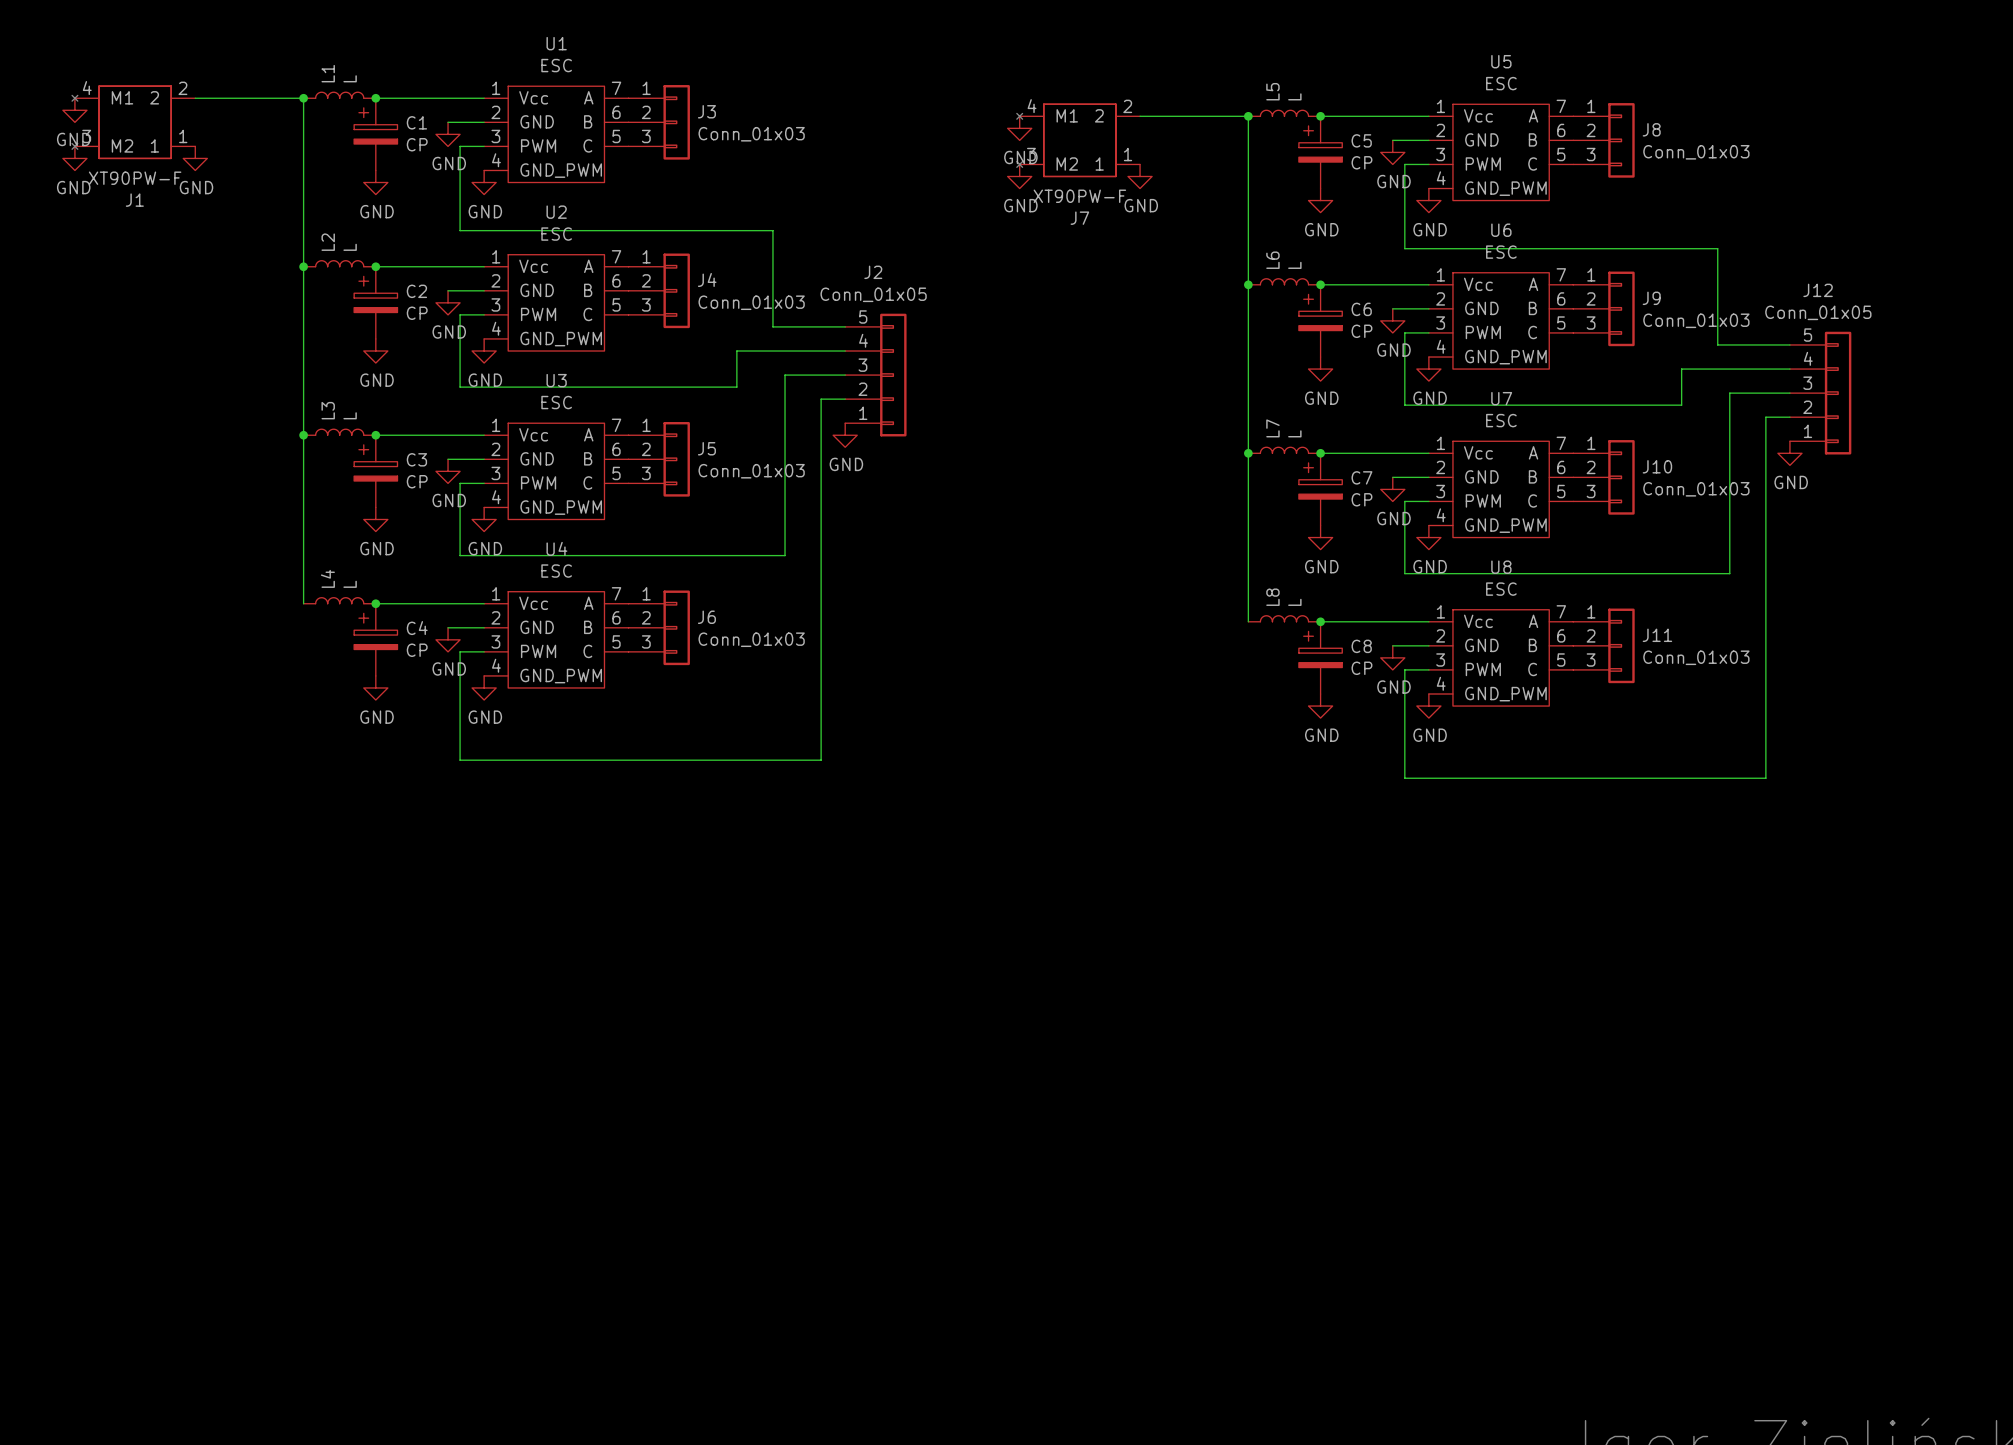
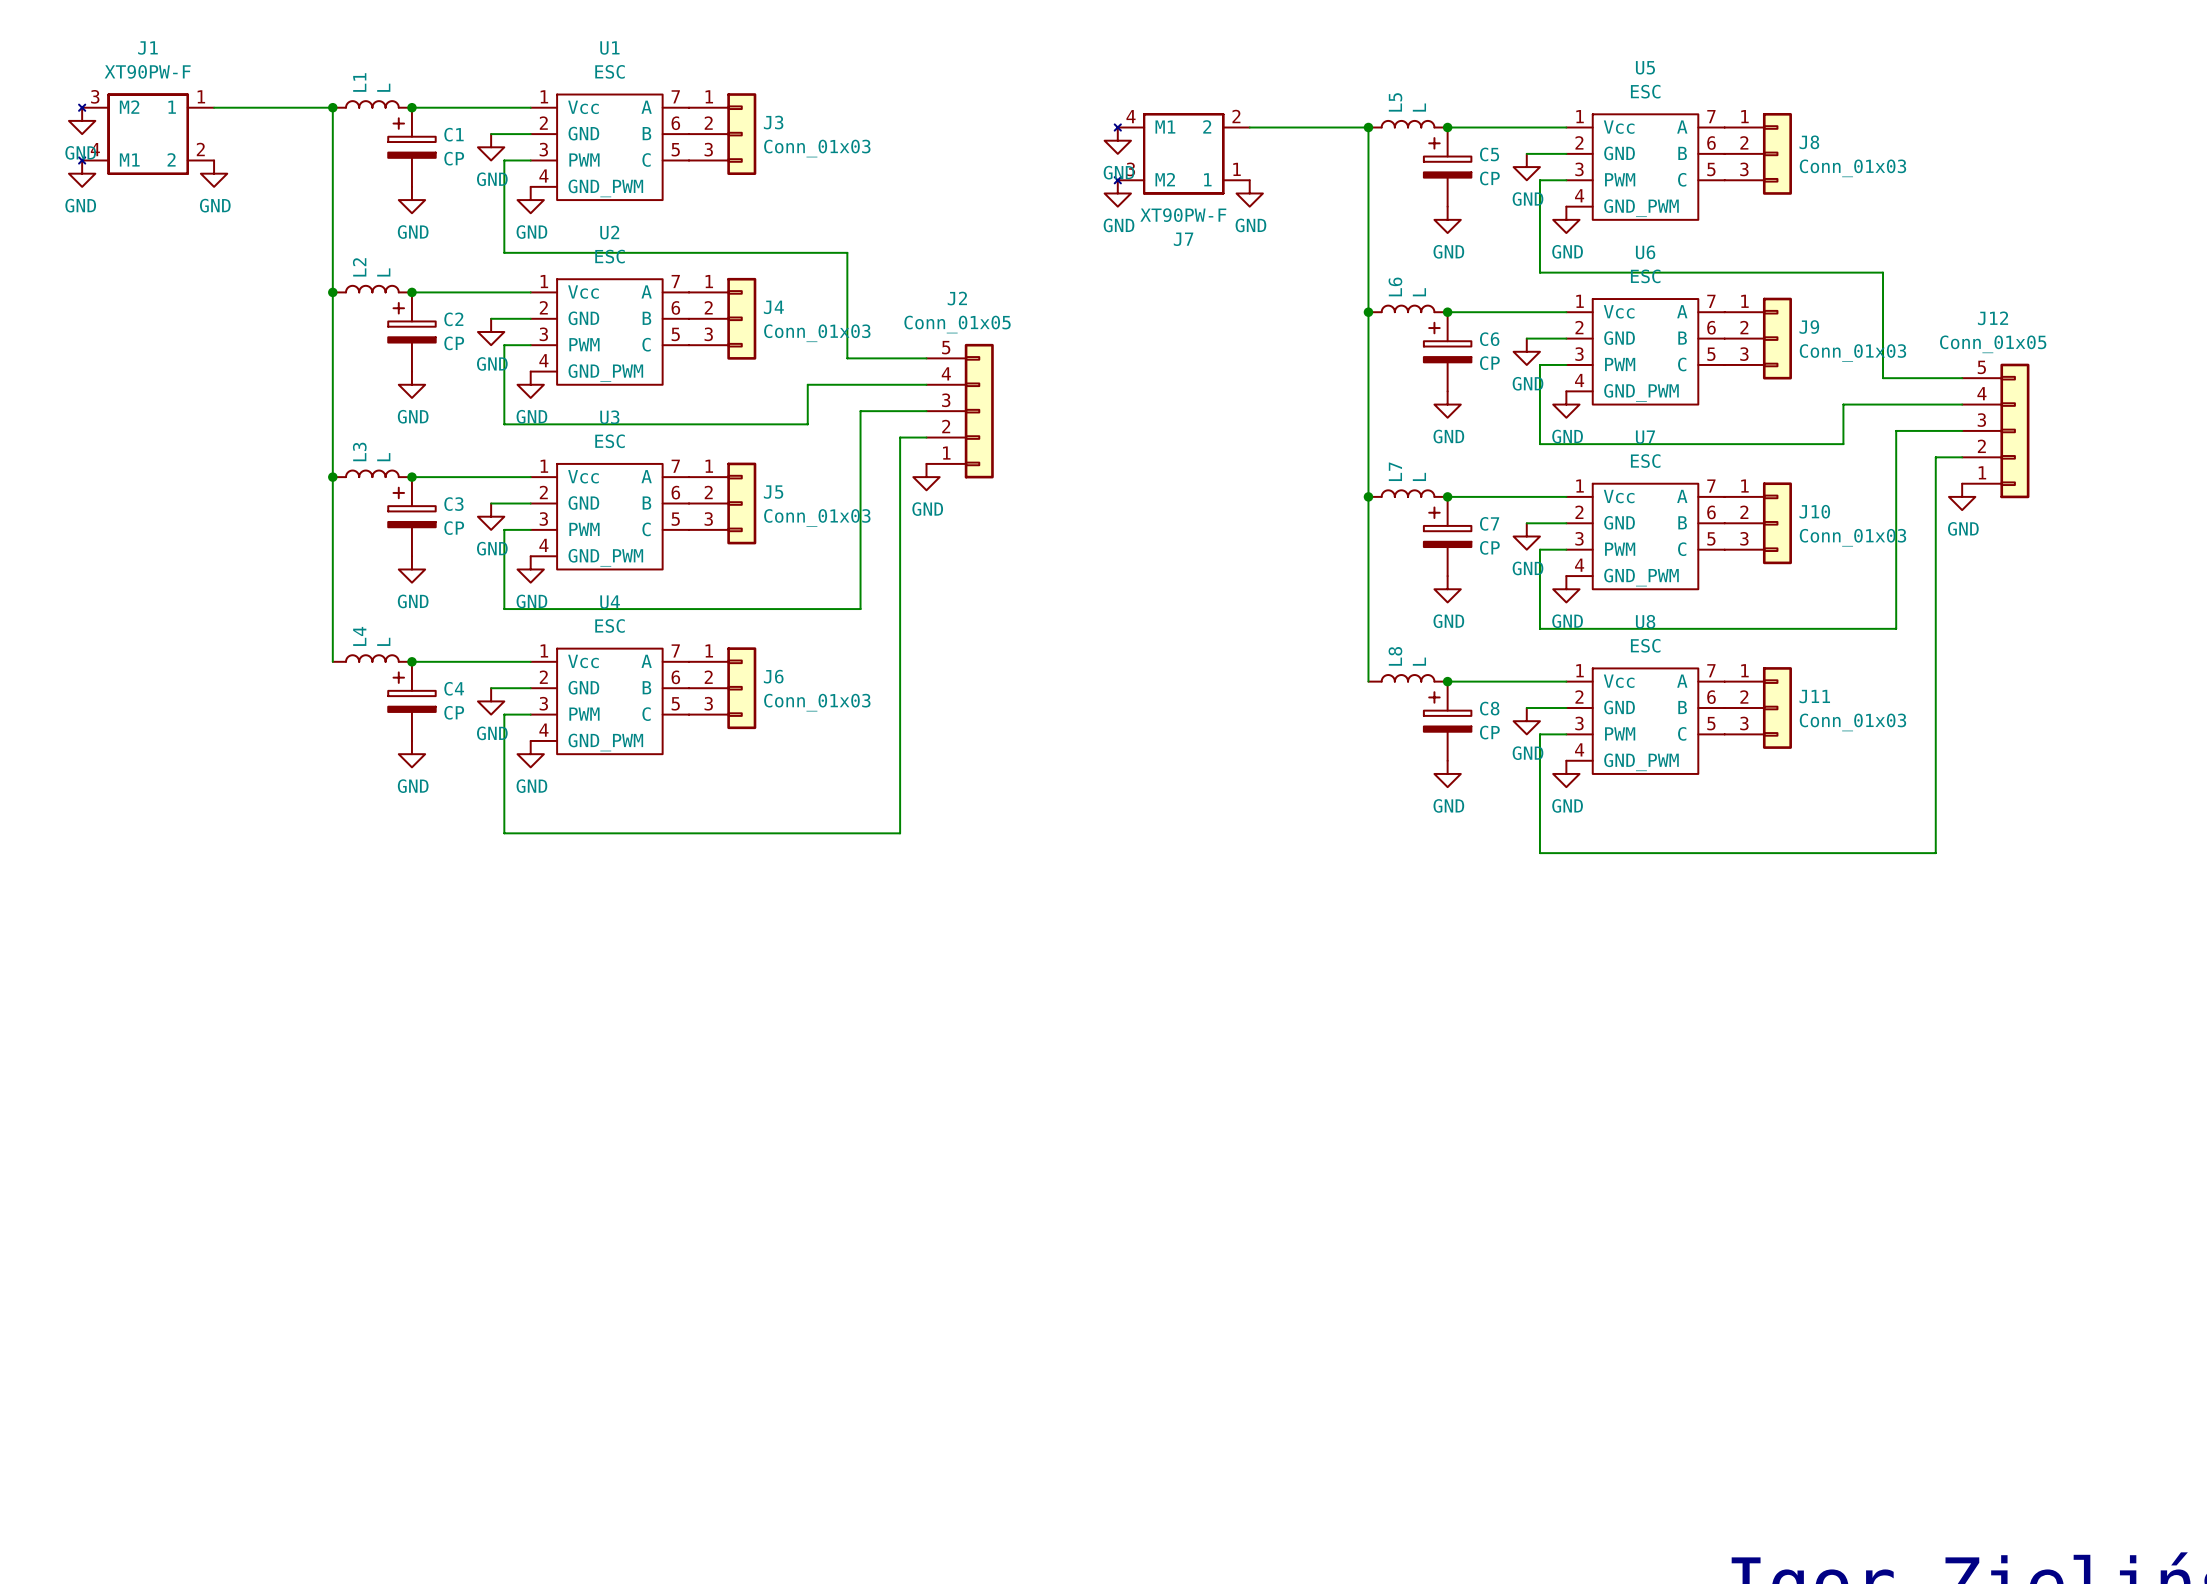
J1 flip: as is (121, 122) -> up-down (133, 134)

